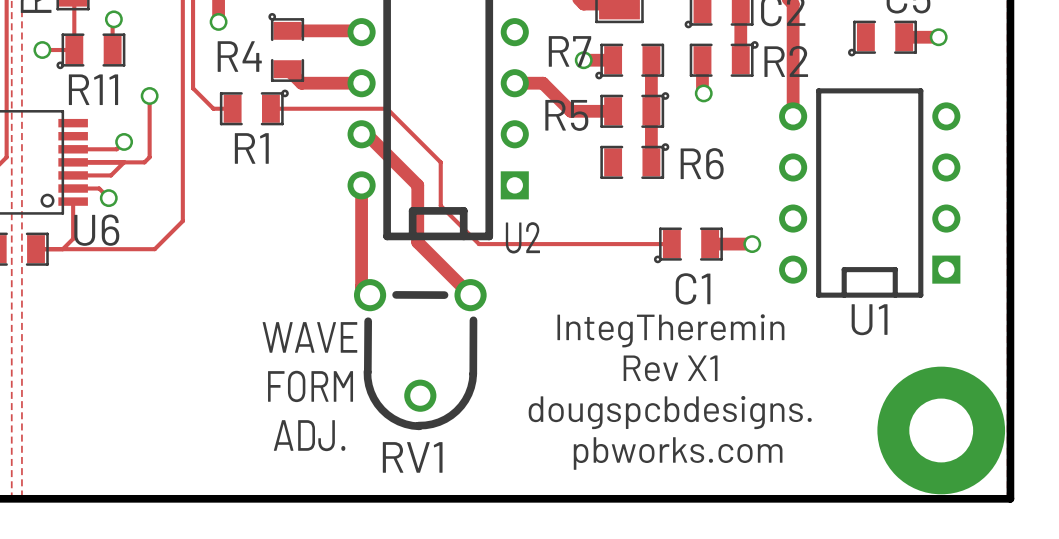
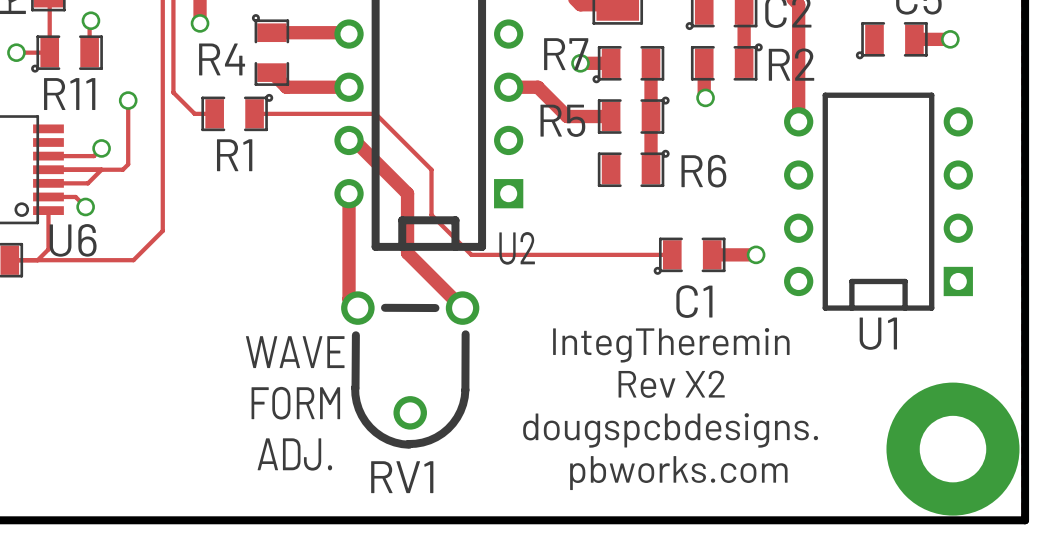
text: Rev X1 (670, 368) -> Rev X2 (671, 384)

